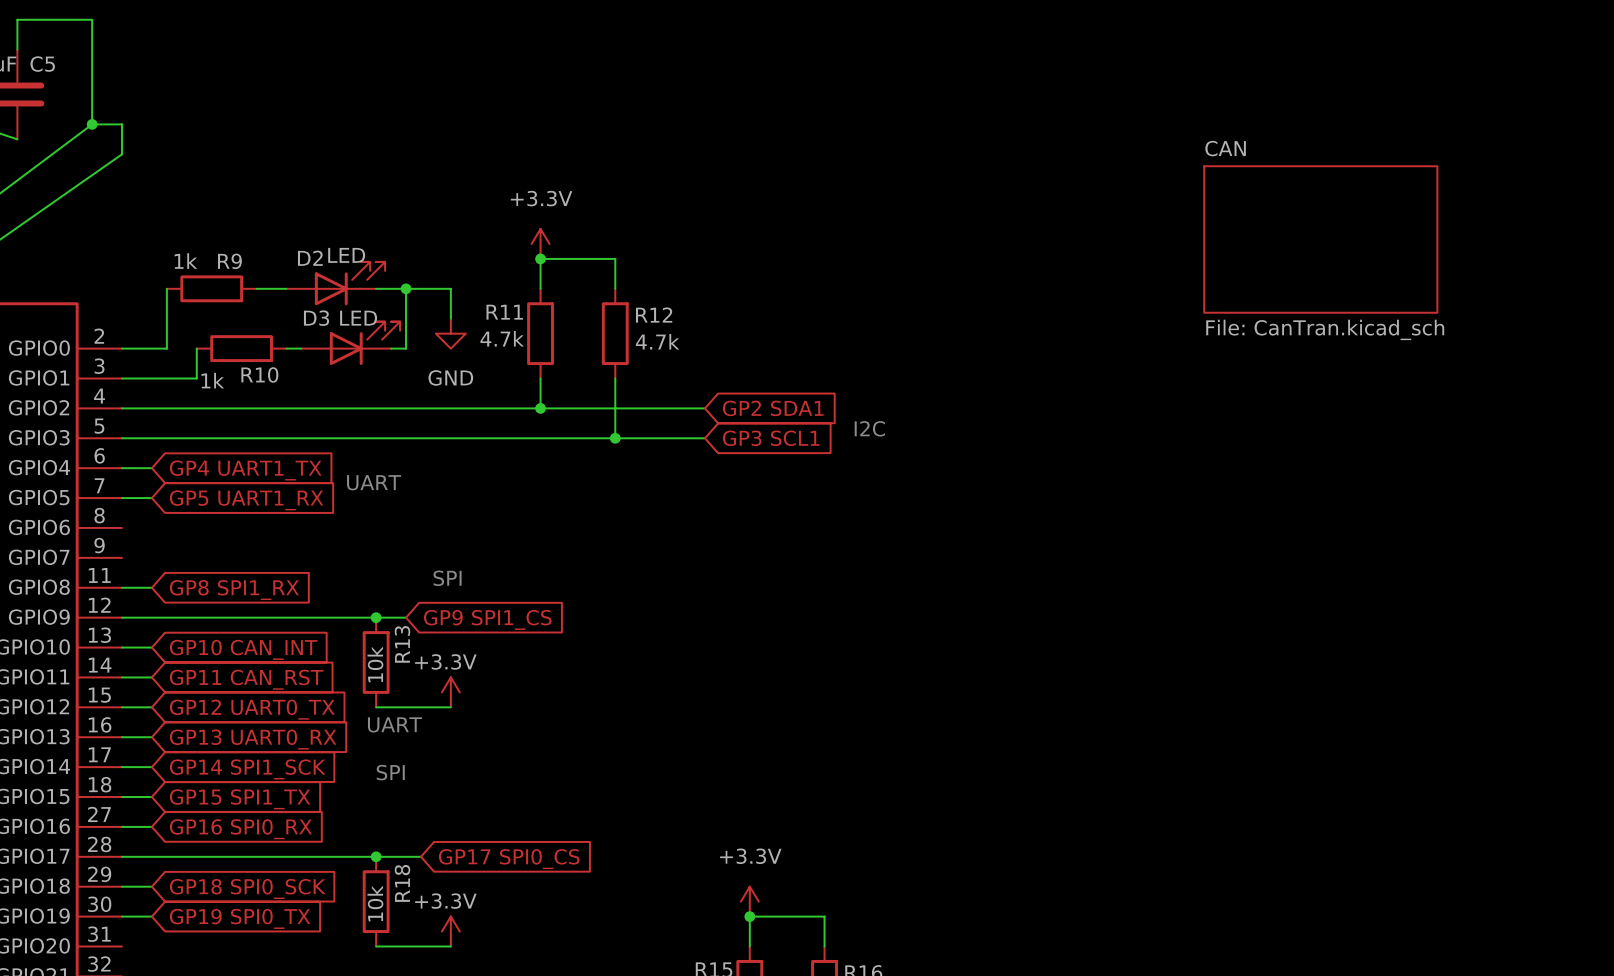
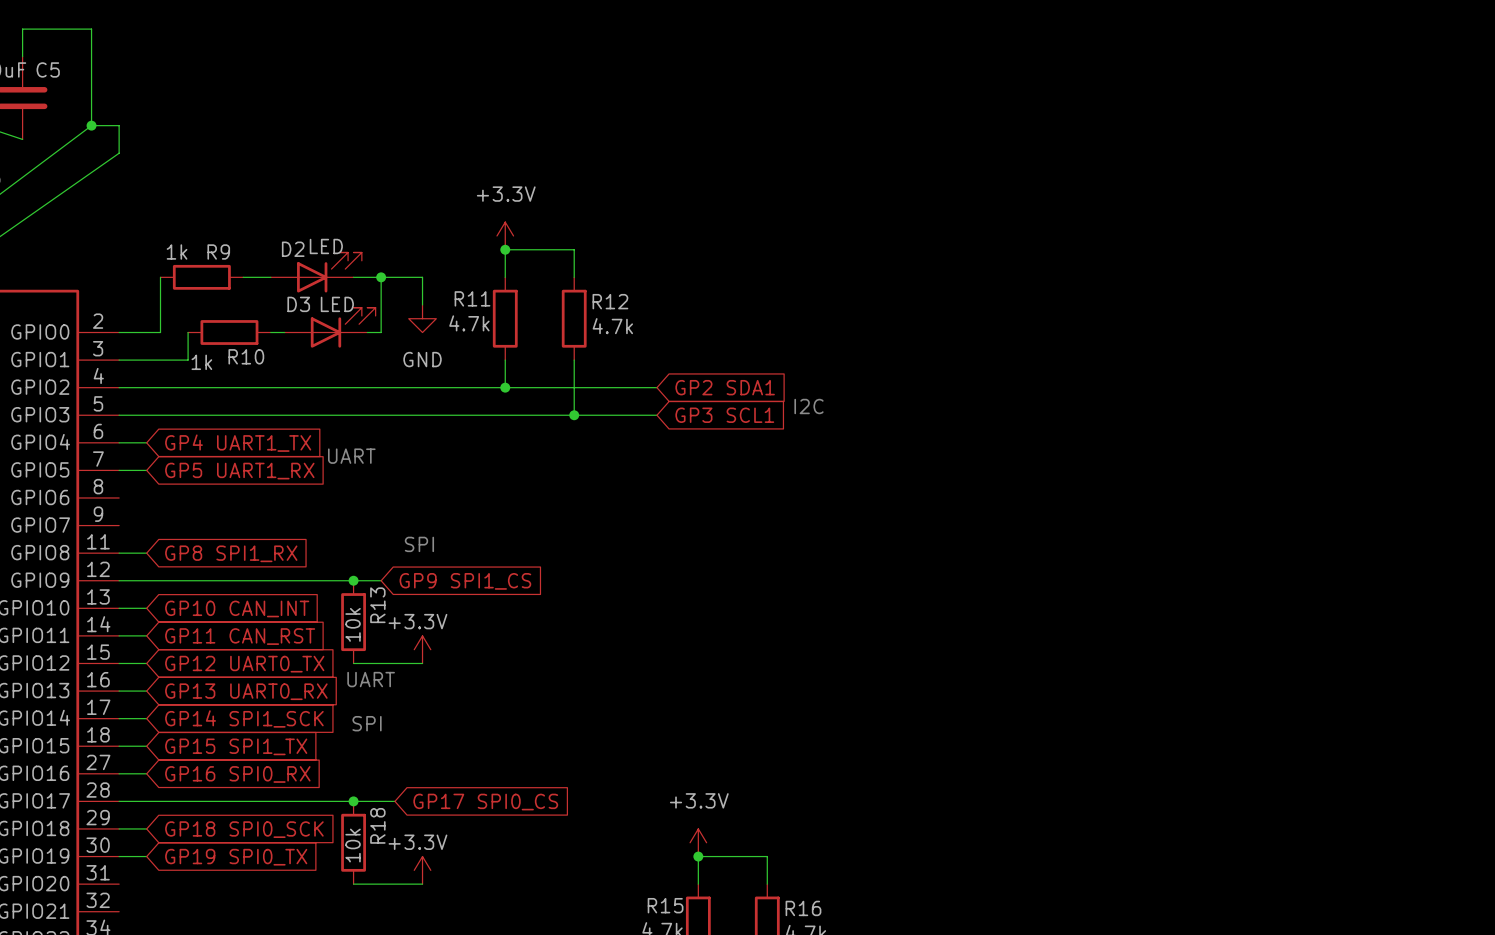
sheet CAN: File: CanTran.kicad_sch (1320, 239) -> none

